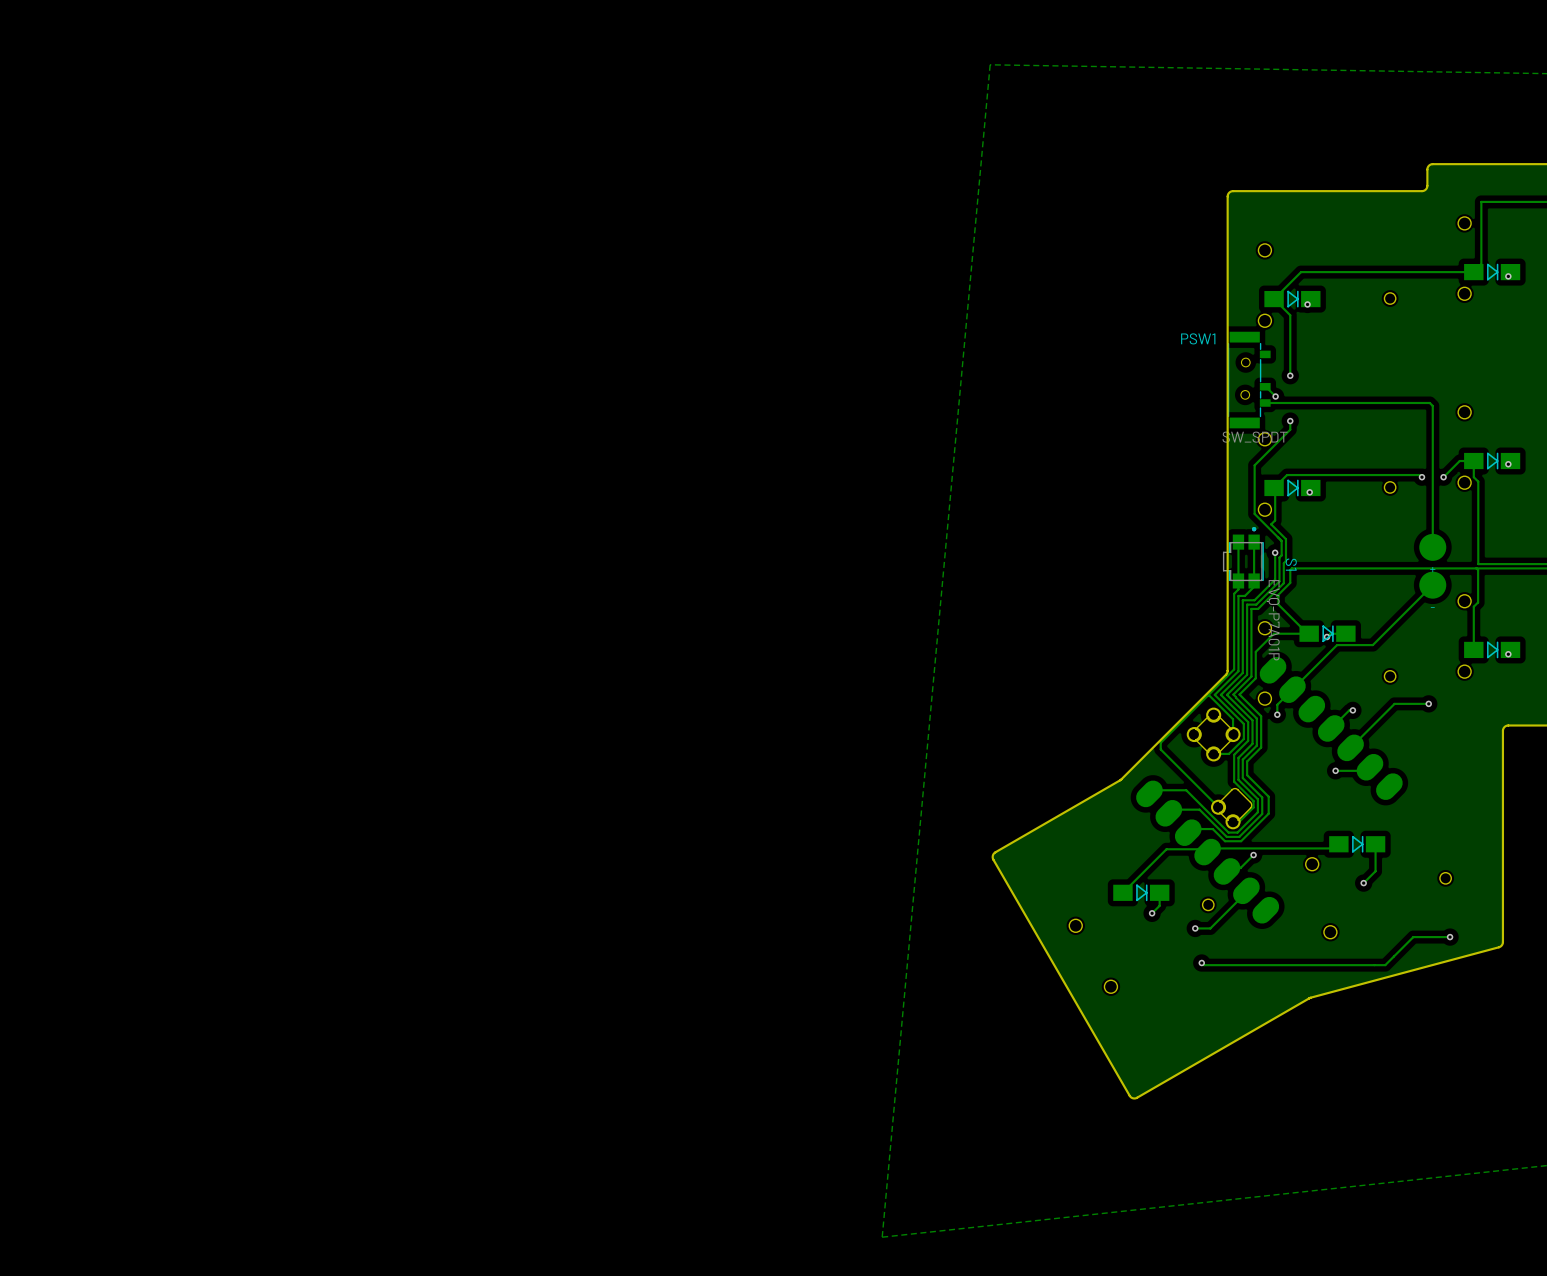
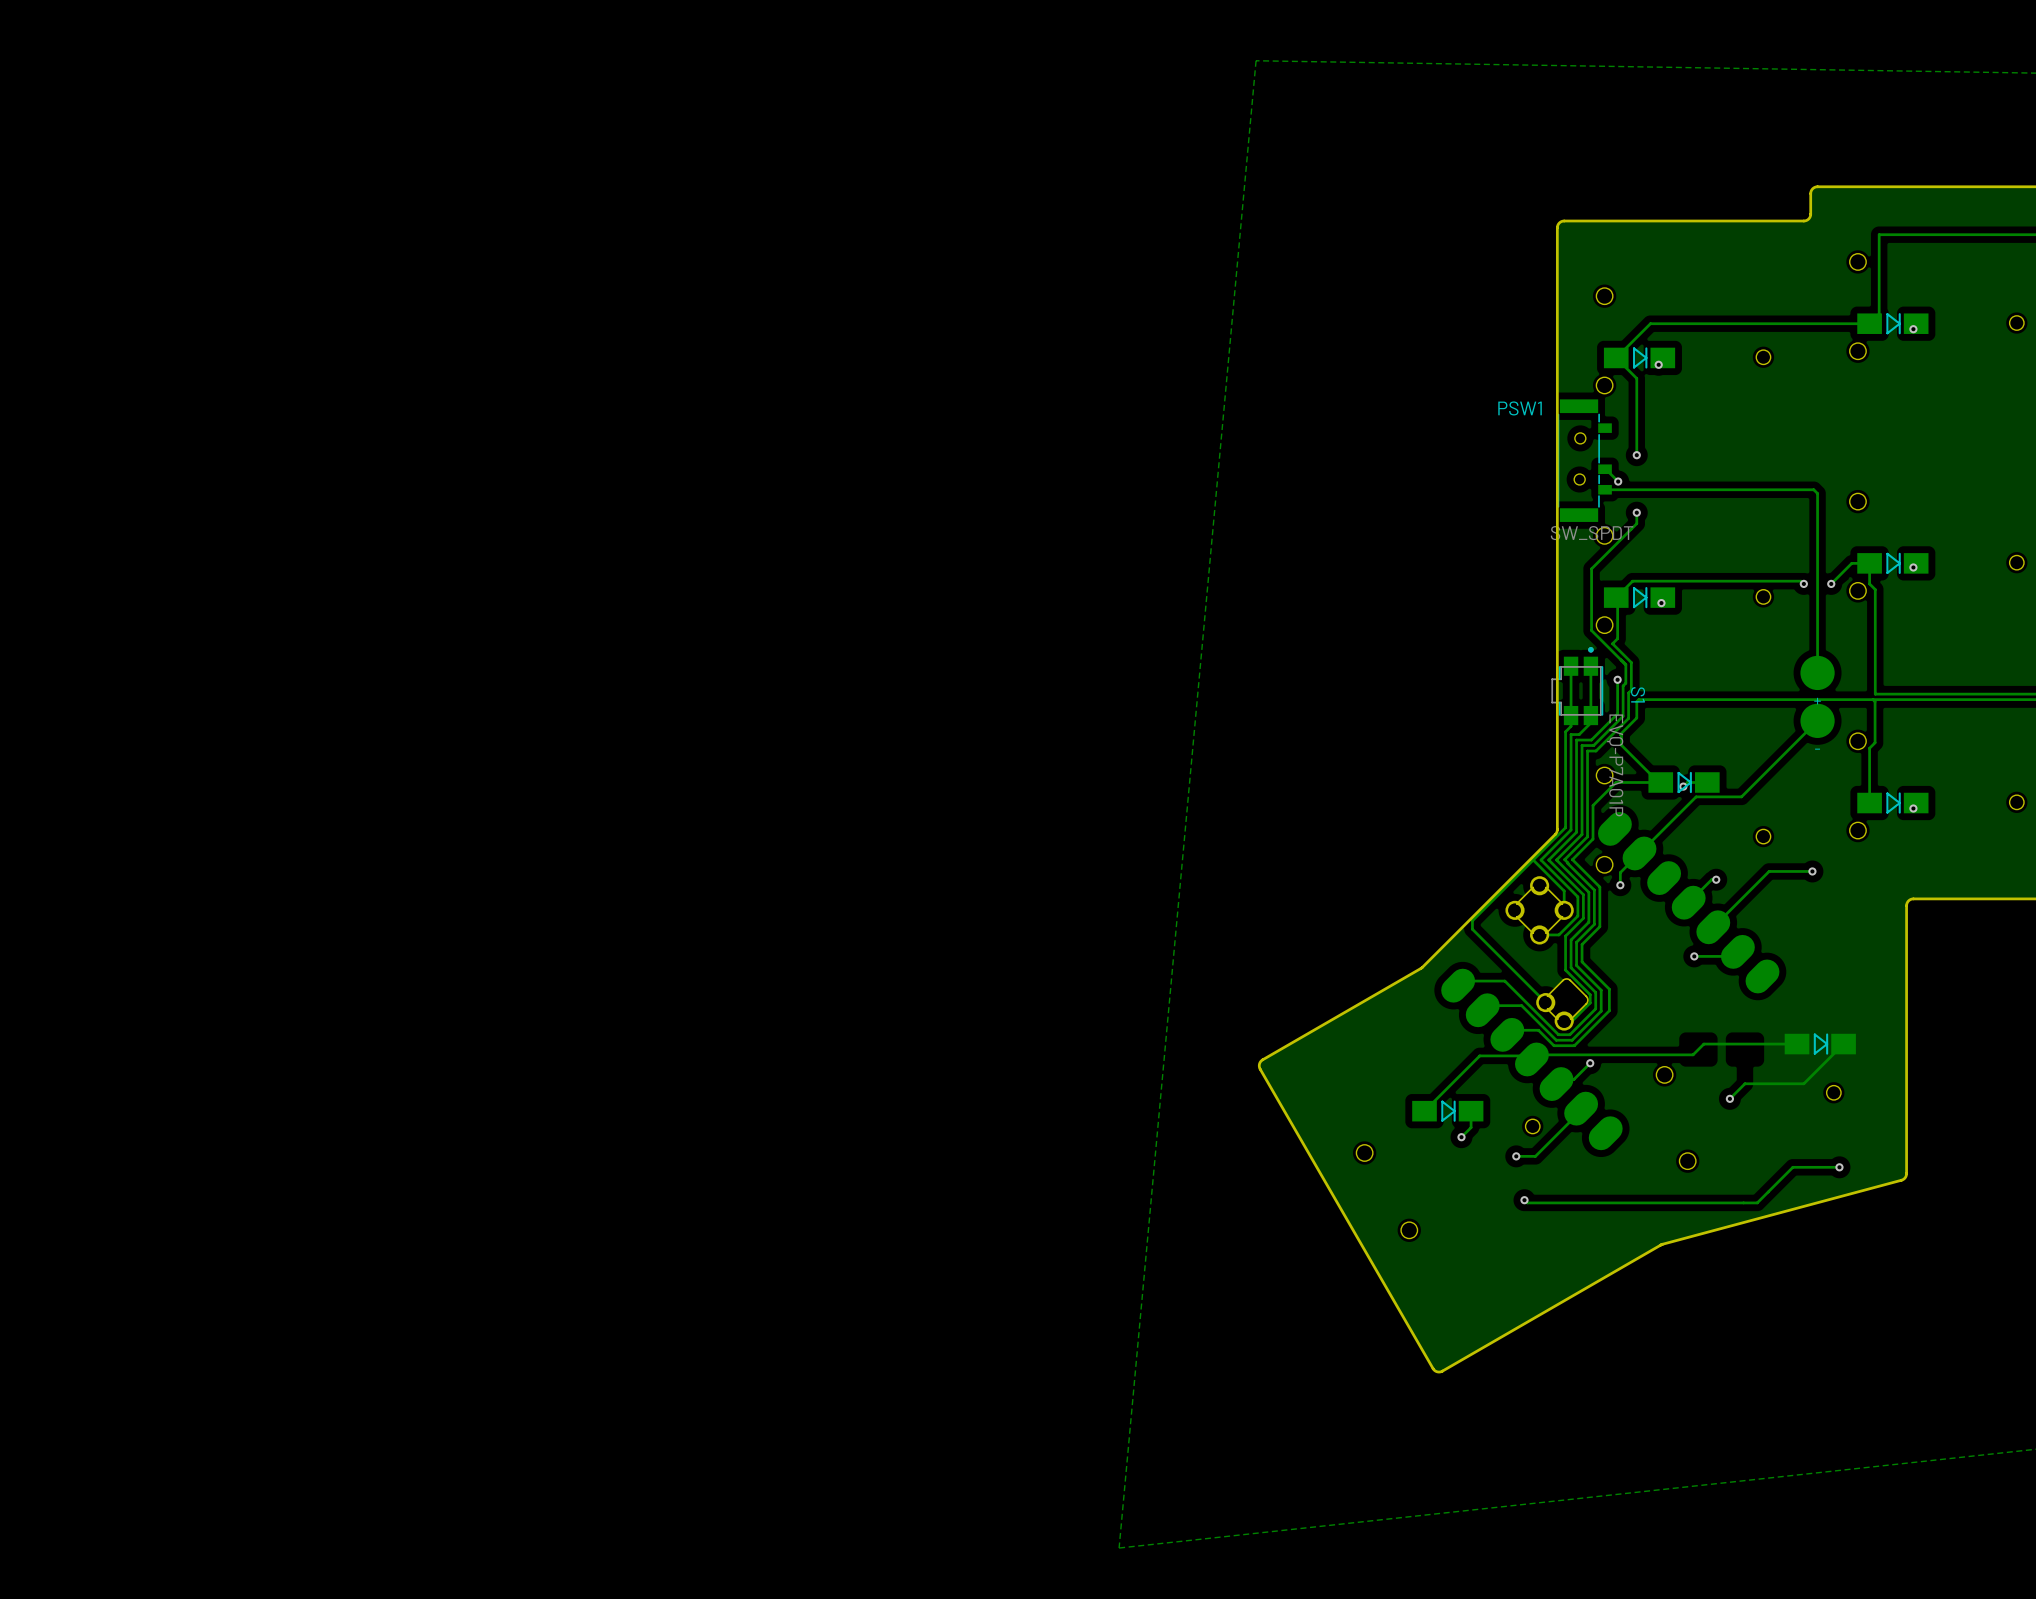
track: none -> (1797, 1044) (1703, 1044) (1698, 1049)
part position: (1357, 844) -> (1820, 1044)
track: (1375, 844) (1375, 871) -> (1843, 1044) (1803, 1083) (1744, 1083)

